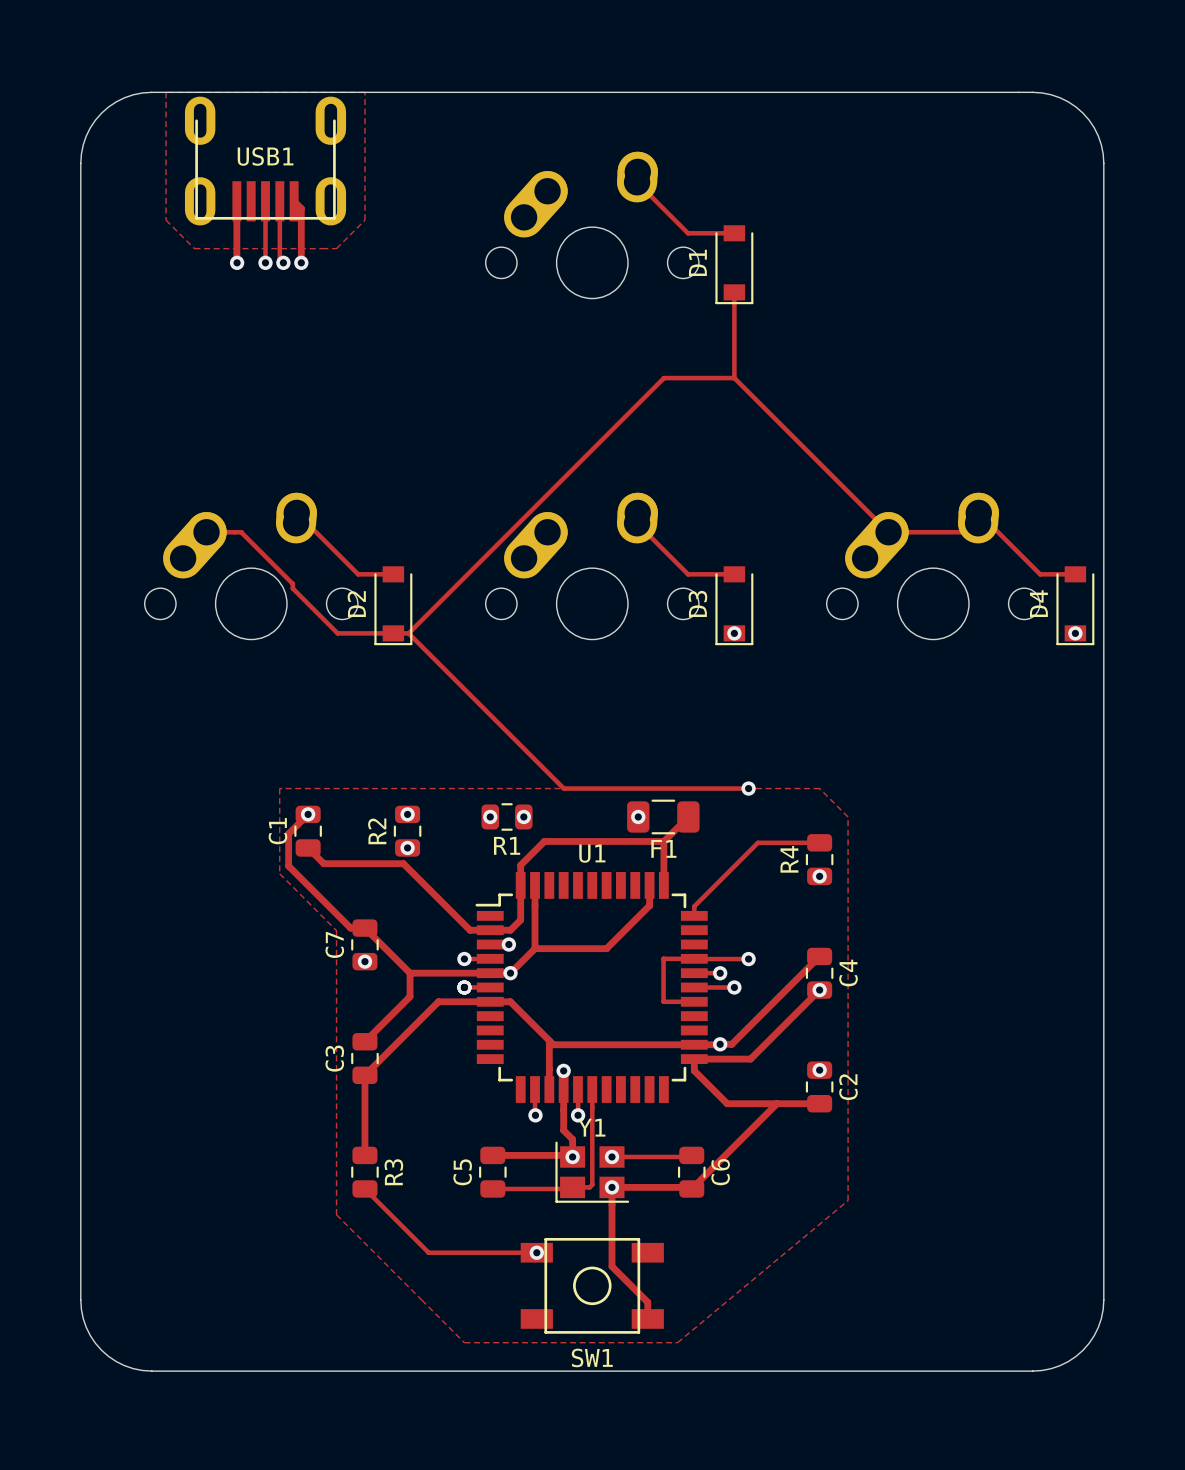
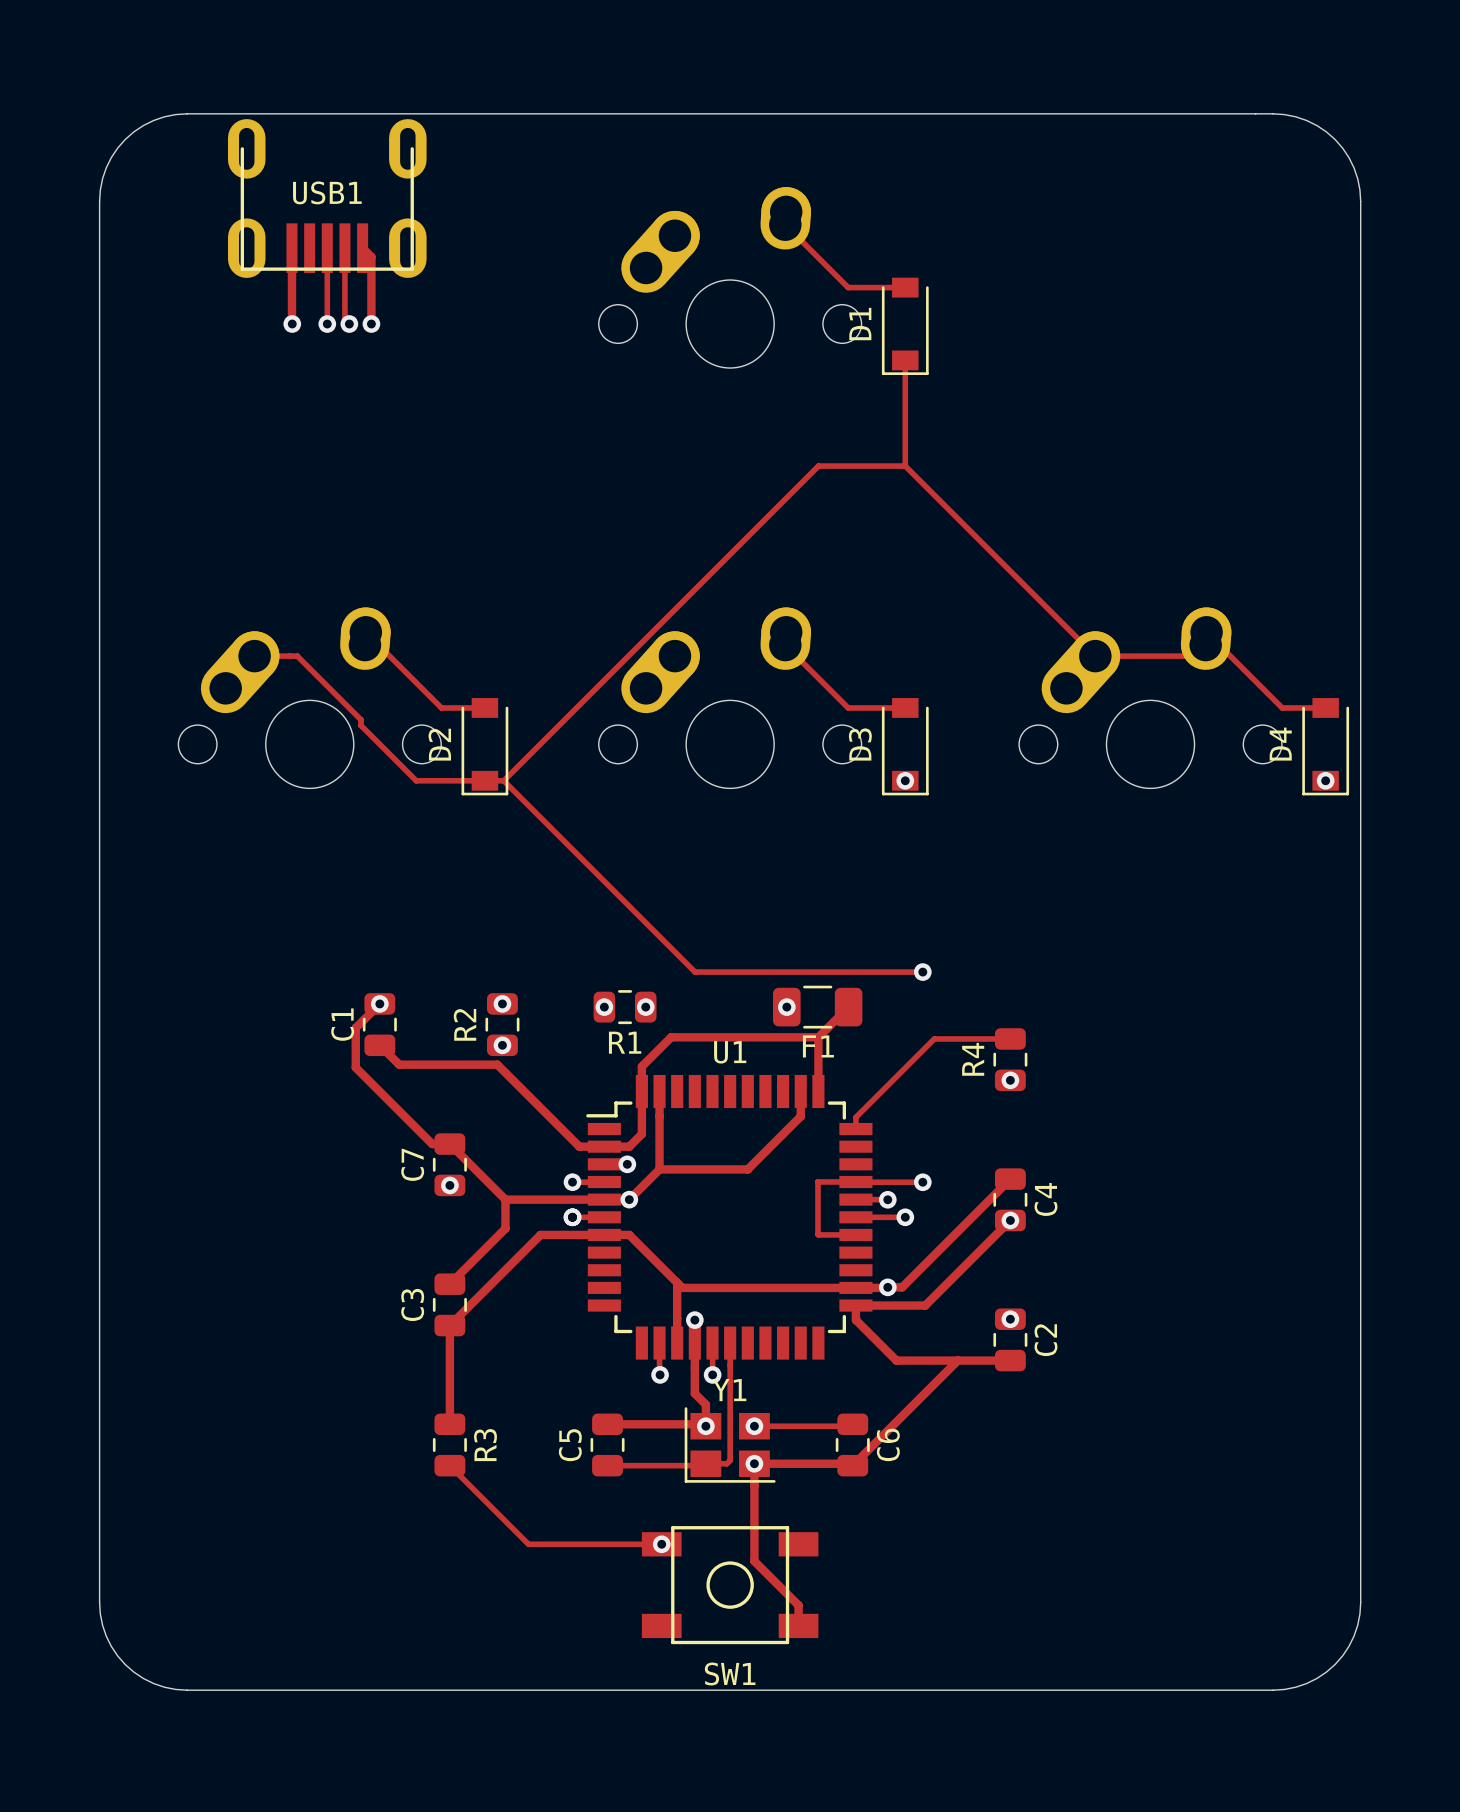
zone outline: (166, 92) (166, 220) (194, 248) (336, 248) (364, 220) (364, 92) (166, 92) -> none
zone outline: (279, 788) (279, 873) (336, 930) (336, 1214) (464, 1342) (677, 1342) (848, 1200) (848, 816) (819, 788) (279, 788) -> none

